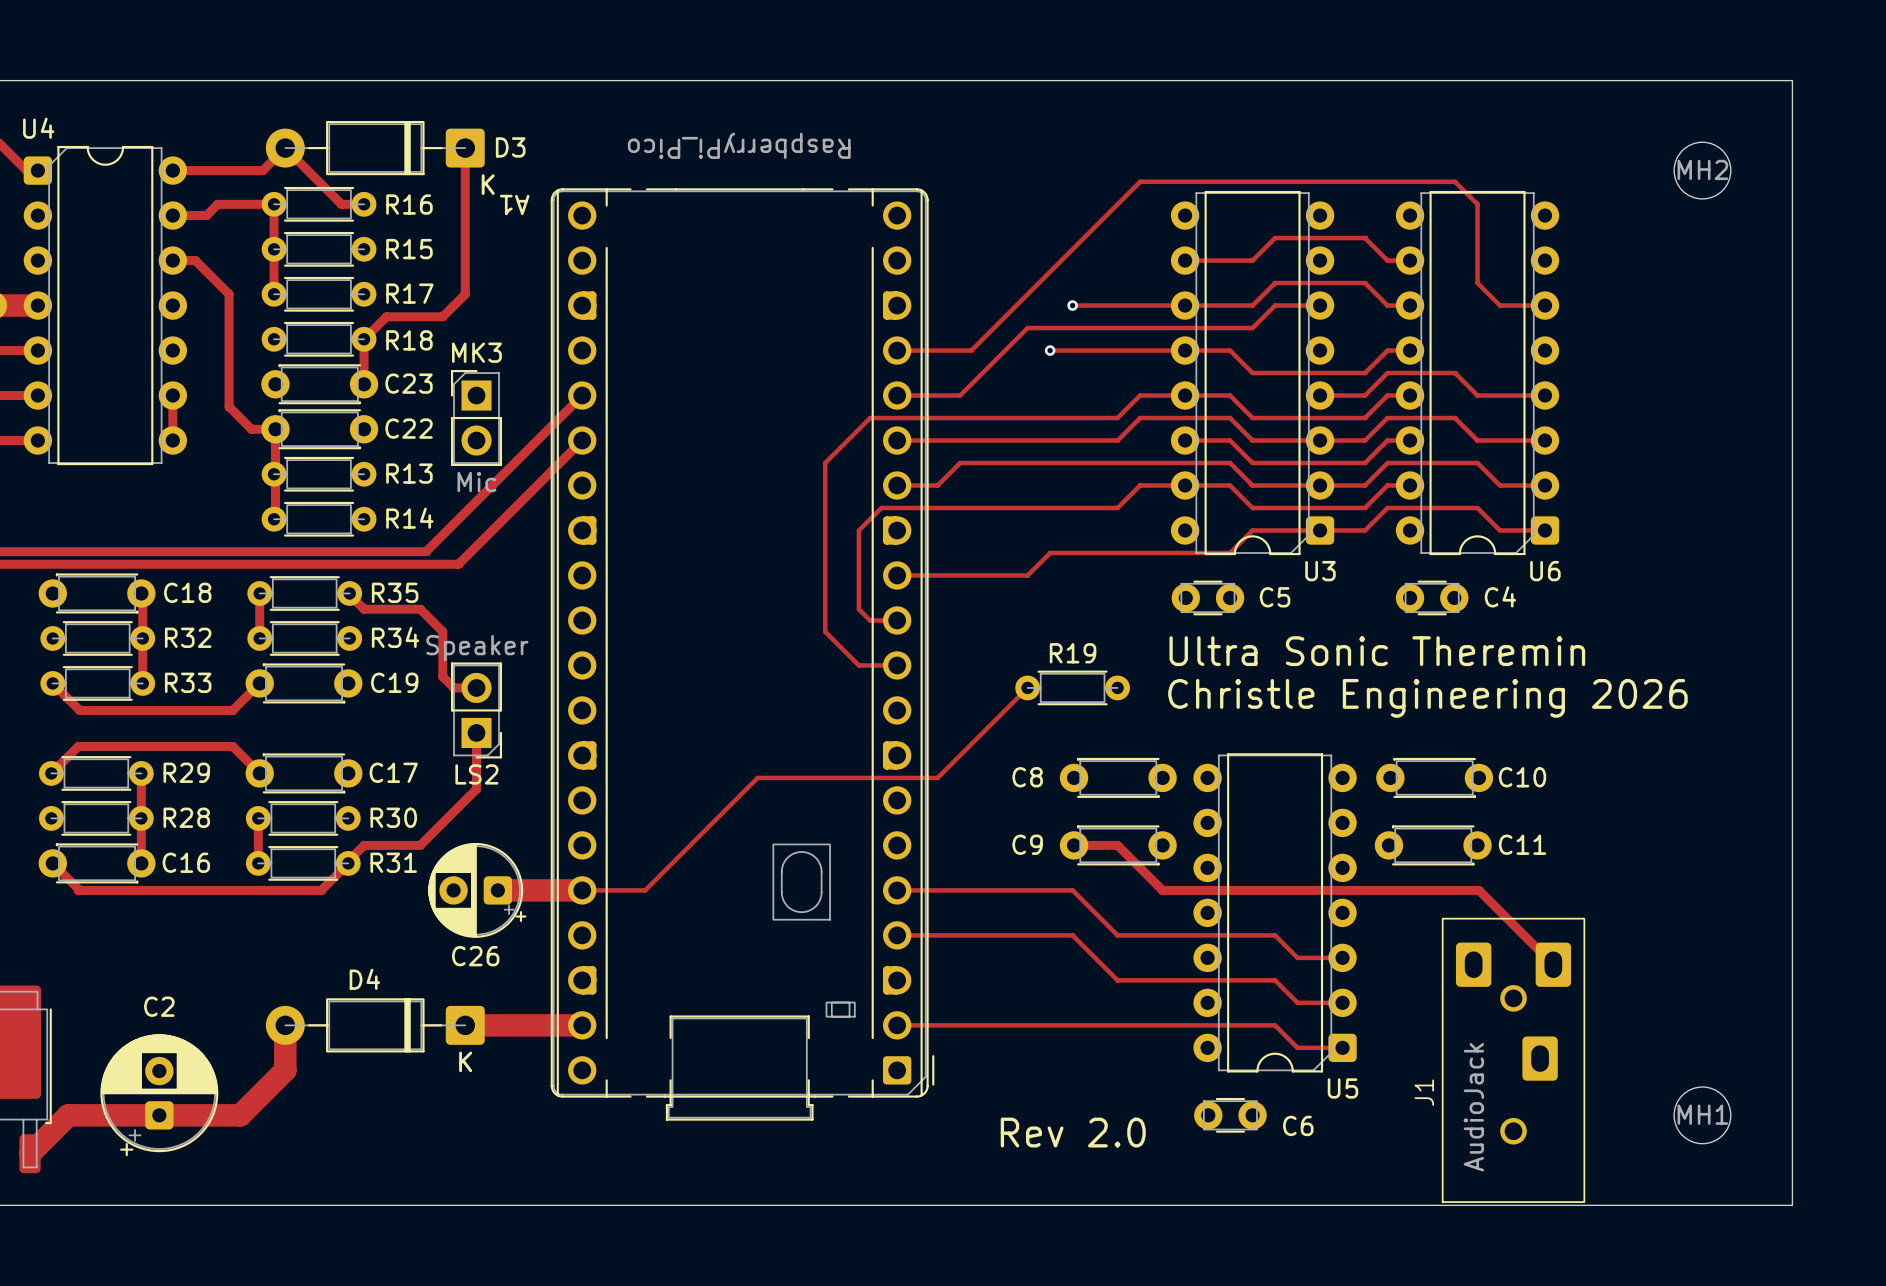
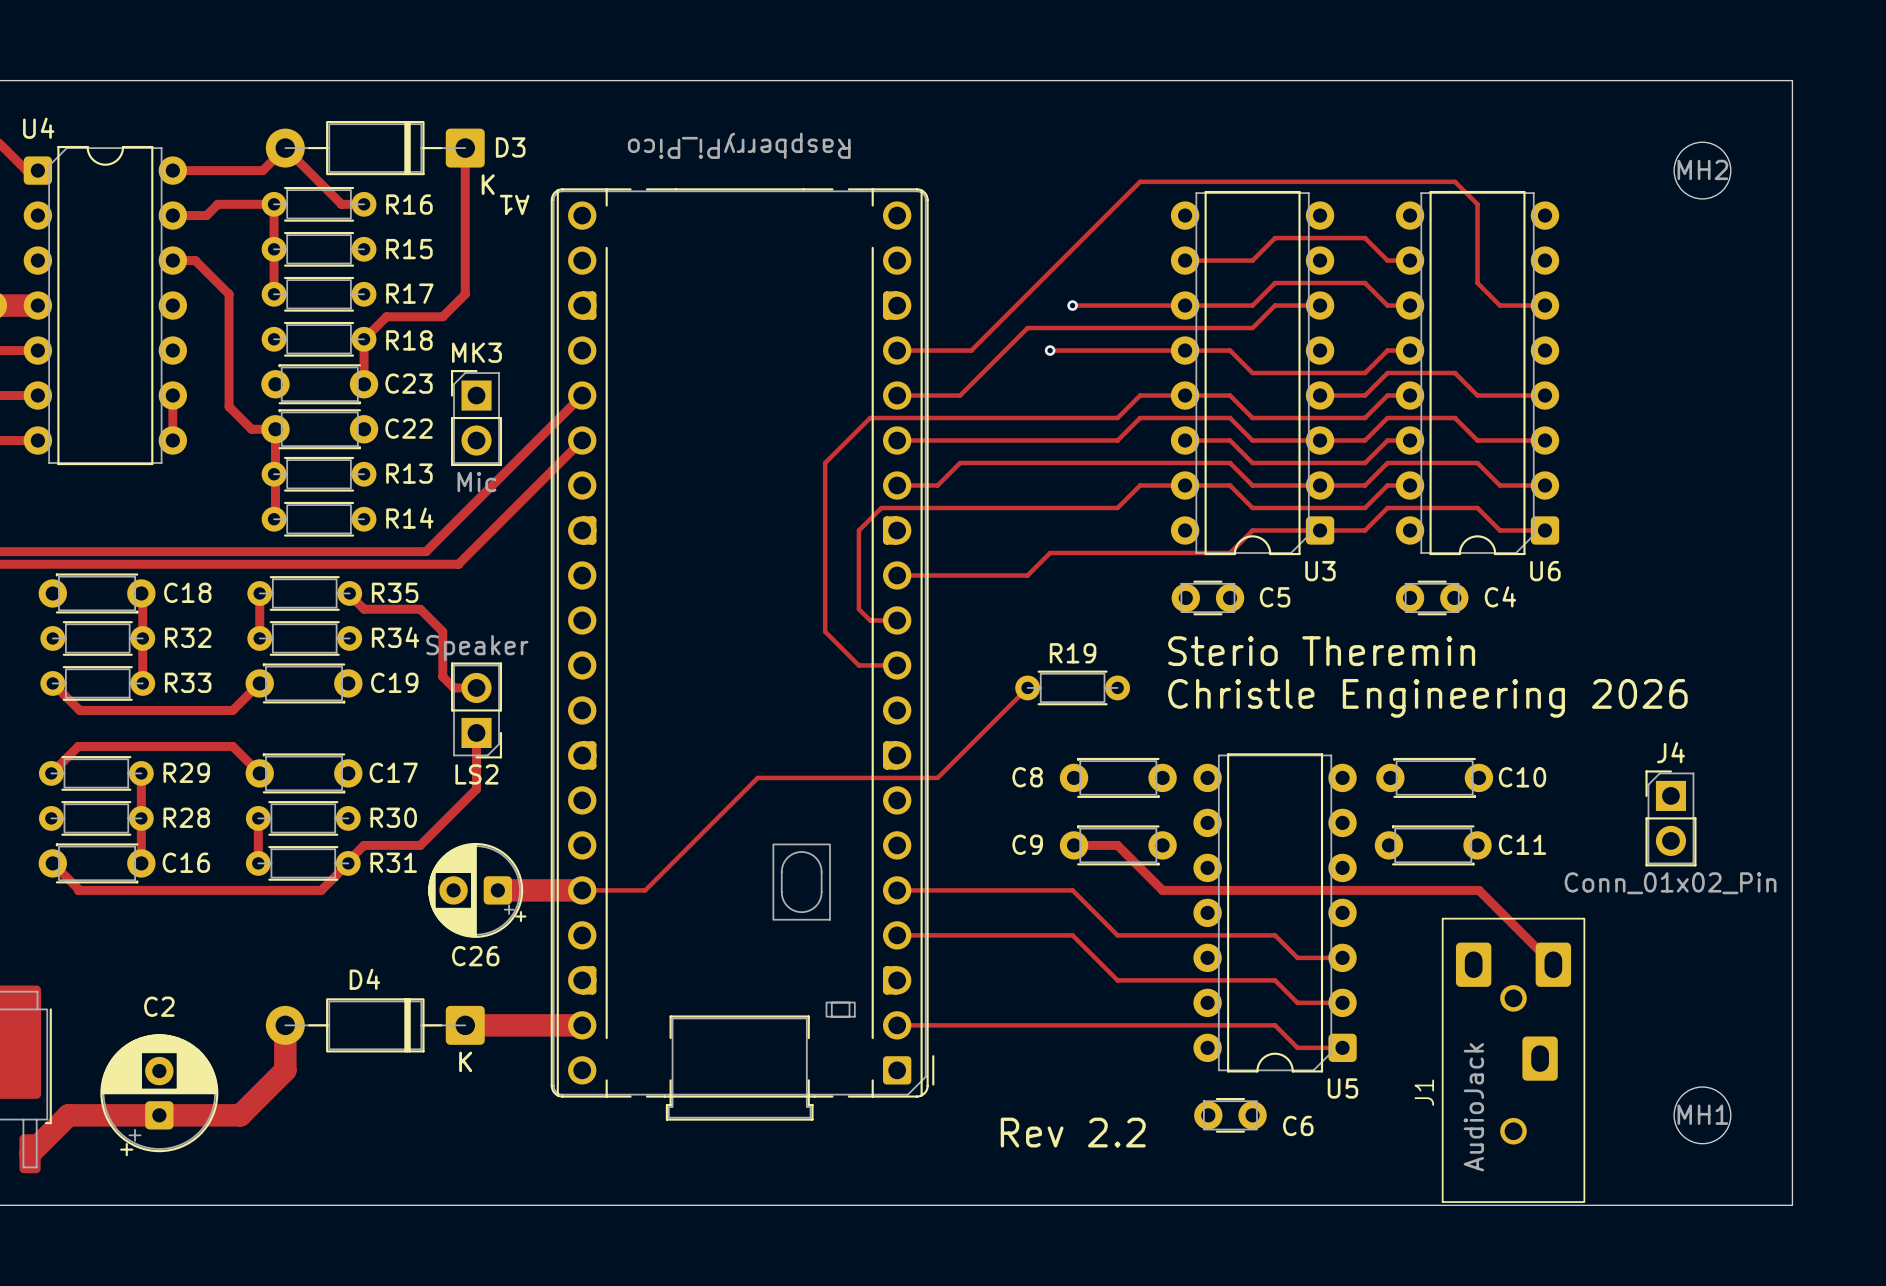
text: Ultra Sonic Theremin (1377, 651) -> Sterio Theremin (1321, 651)
J4: none -> Conn_01x02_Pin (1670, 818)
text: Rev 2.0 (1073, 1132) -> Rev 2.2 (1073, 1132)

